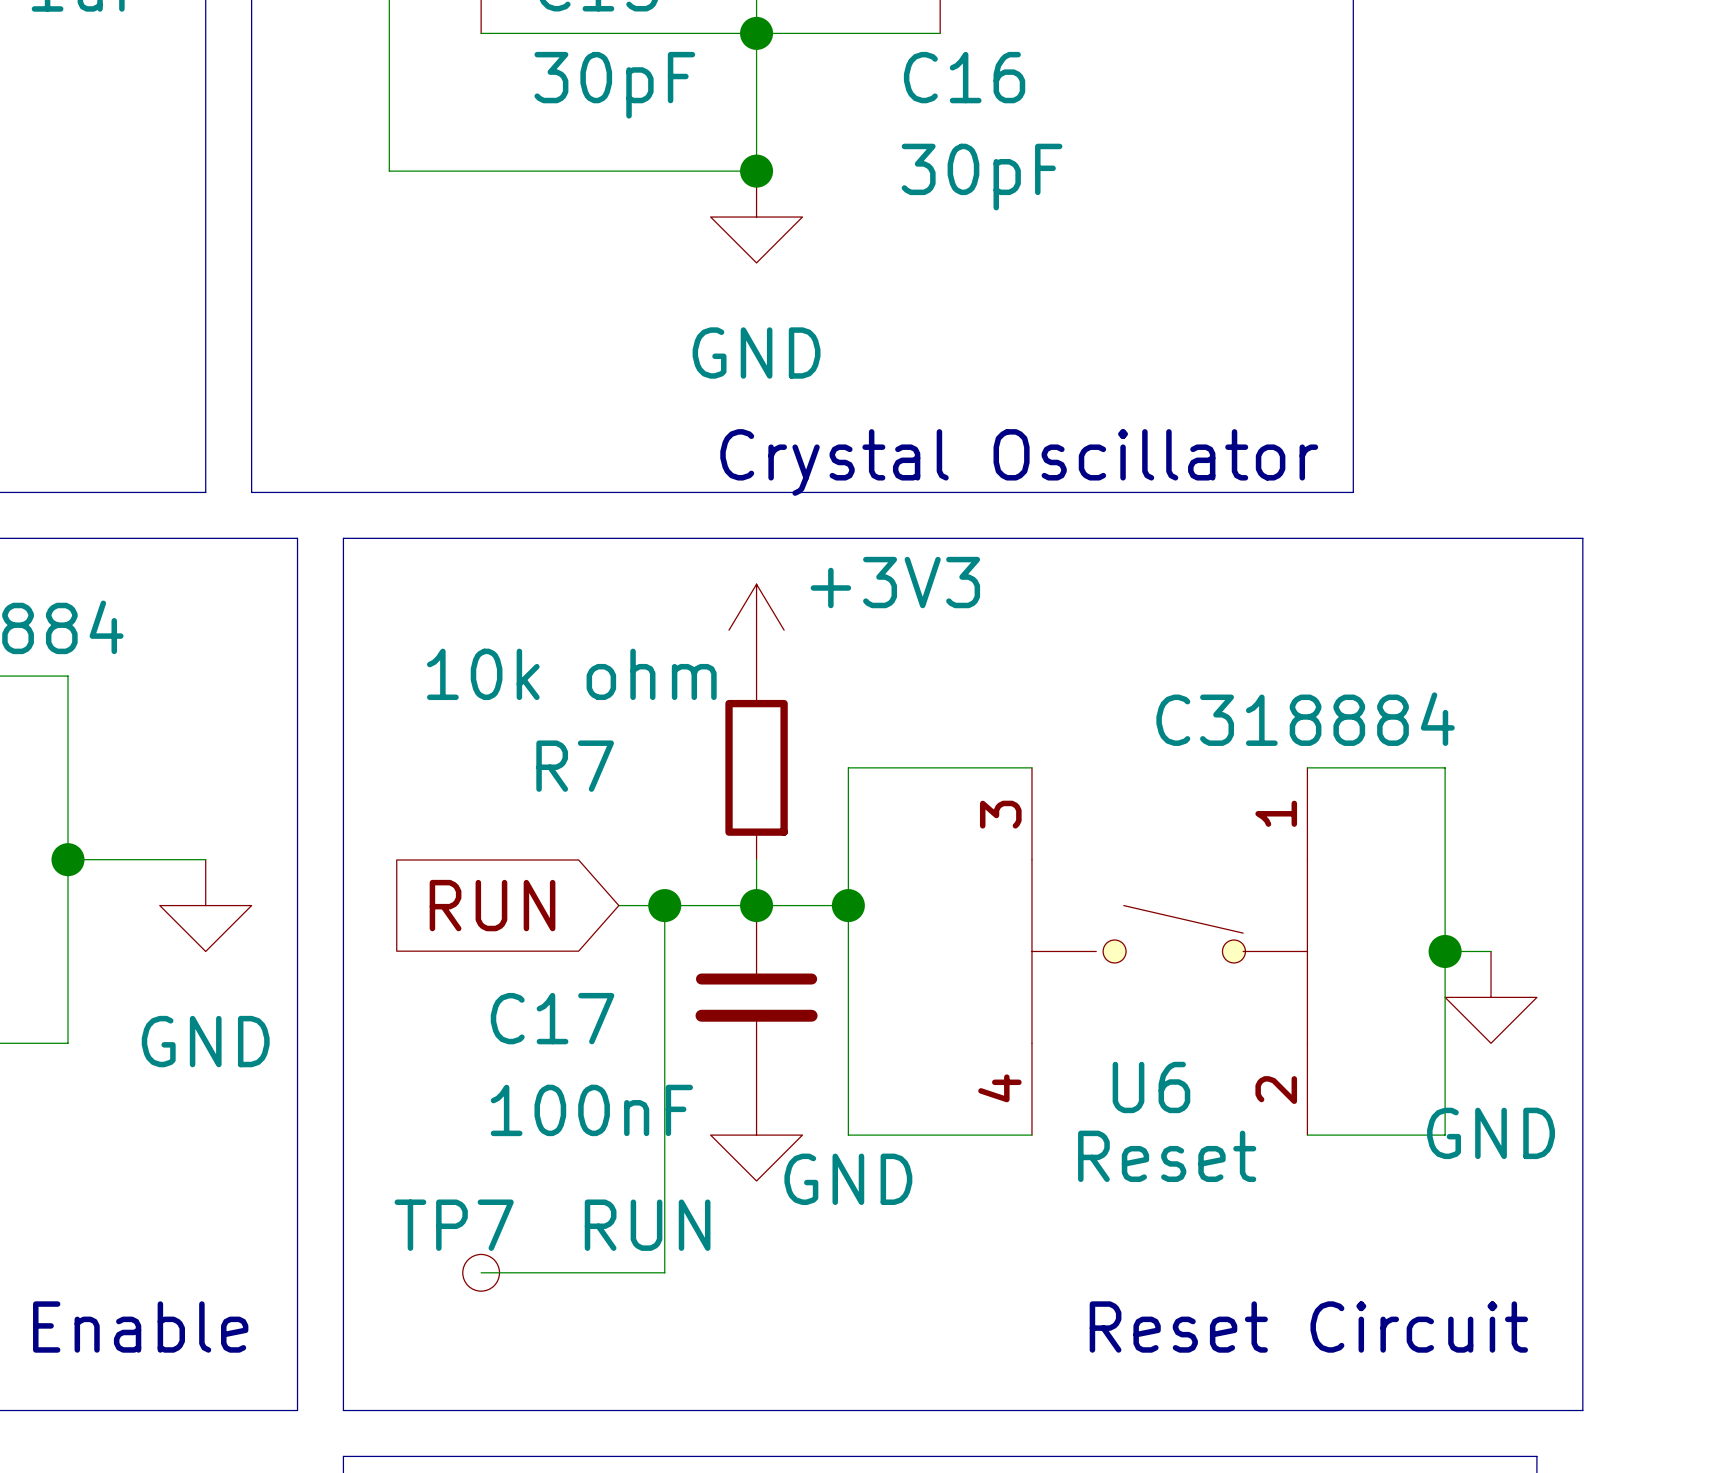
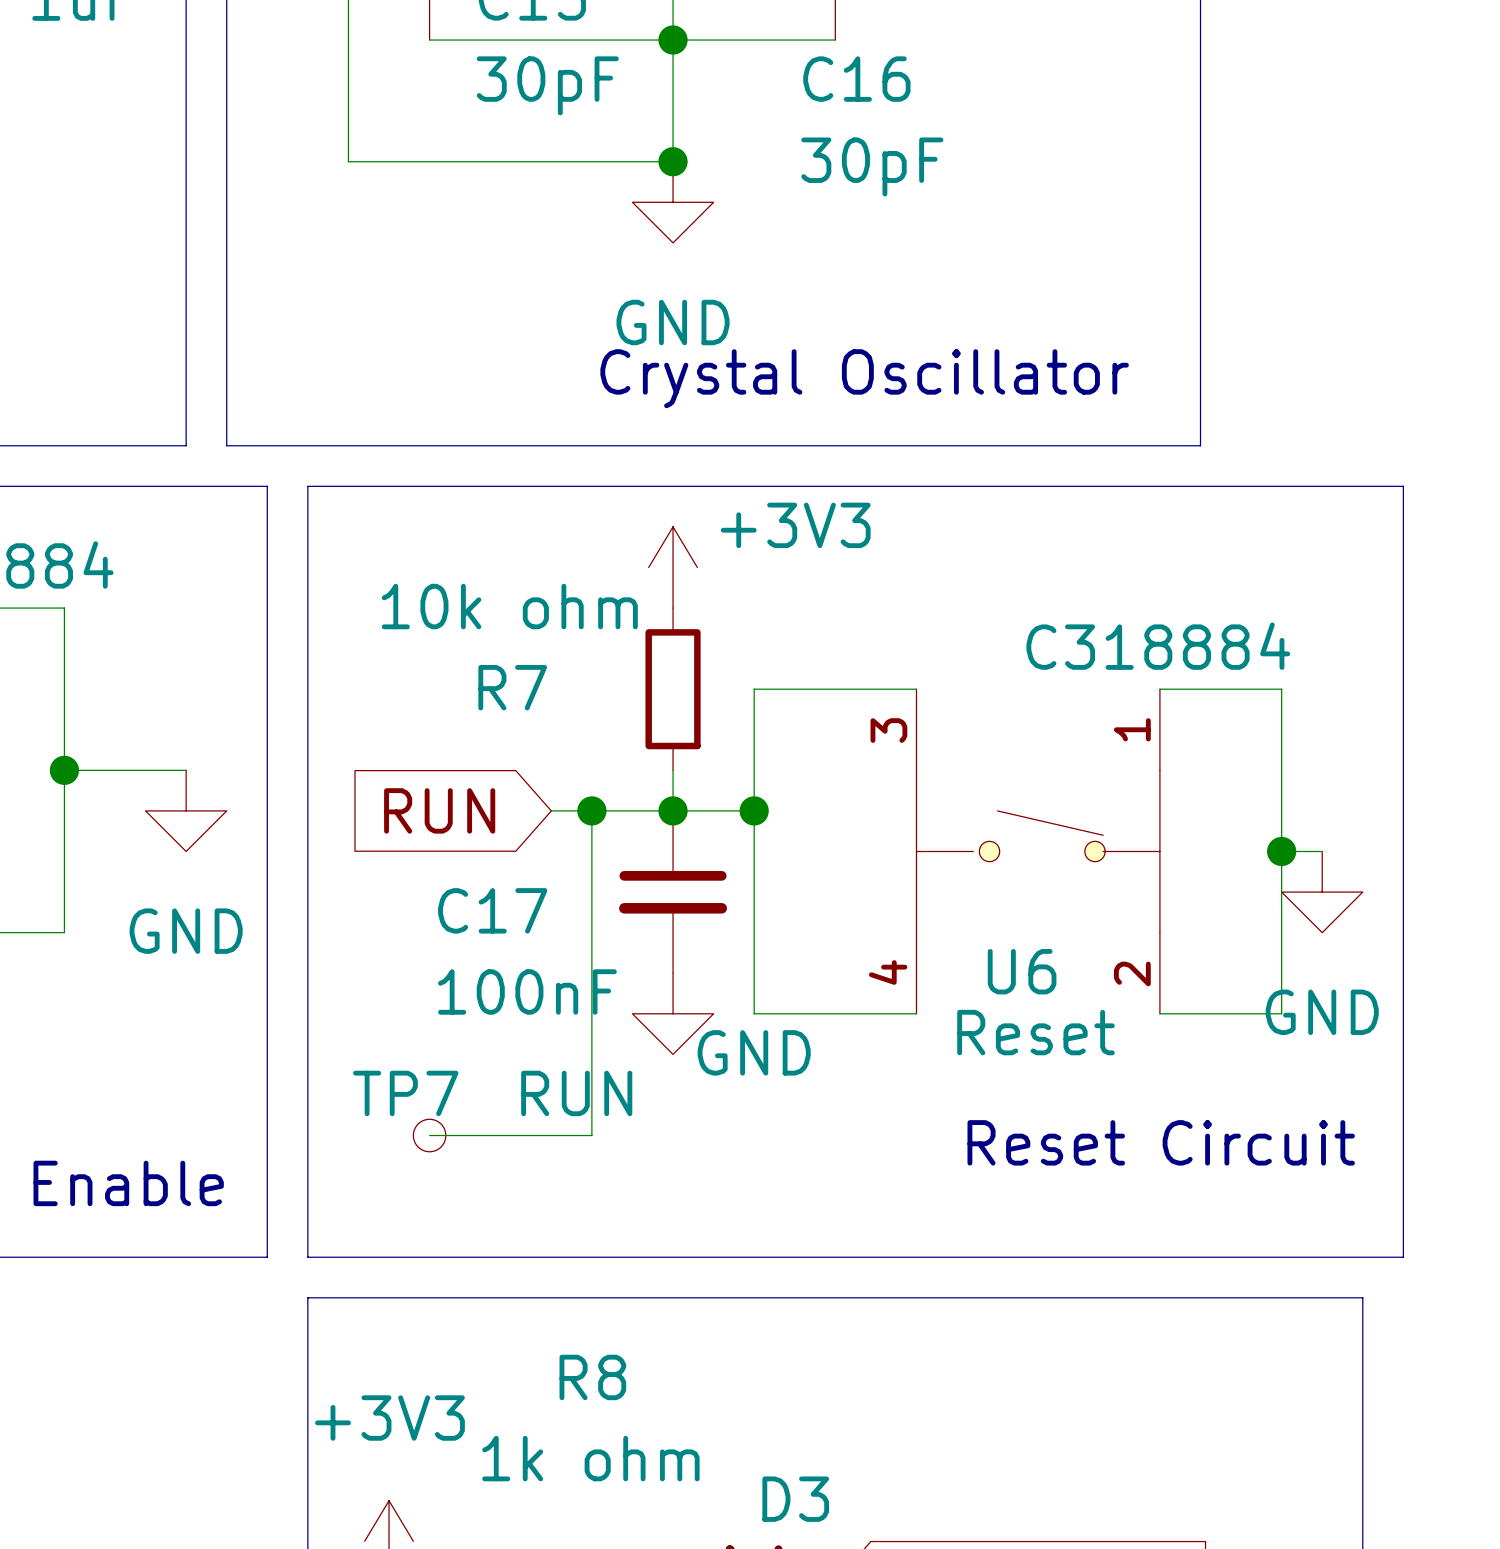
text position: Crystal Oscillator (1019, 462) -> Crystal Oscillator (864, 378)
text position: Reset Circuit (1308, 1327) -> Reset Circuit (1161, 1142)

